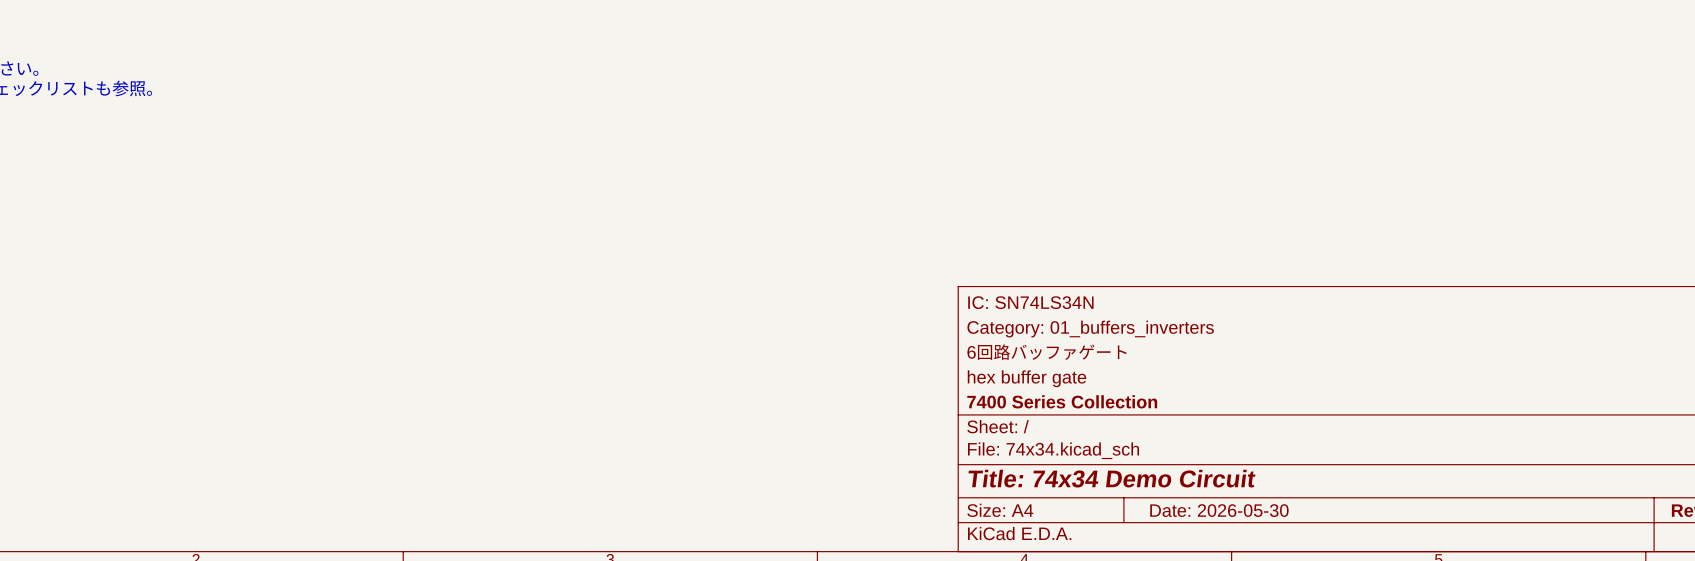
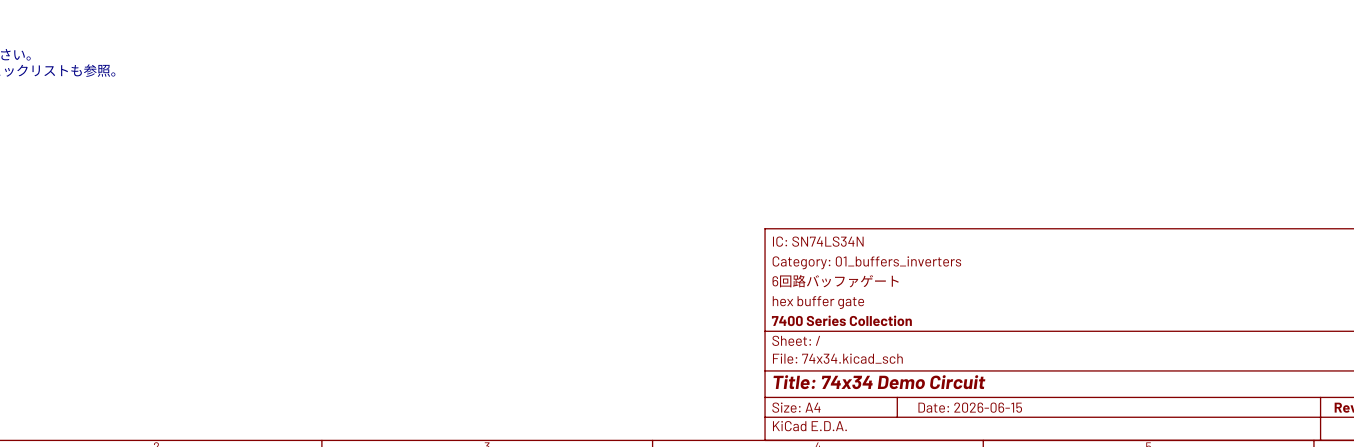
title block: Date: 2026-05-30 (1219, 510) -> Date: 2026-06-15 (970, 407)

